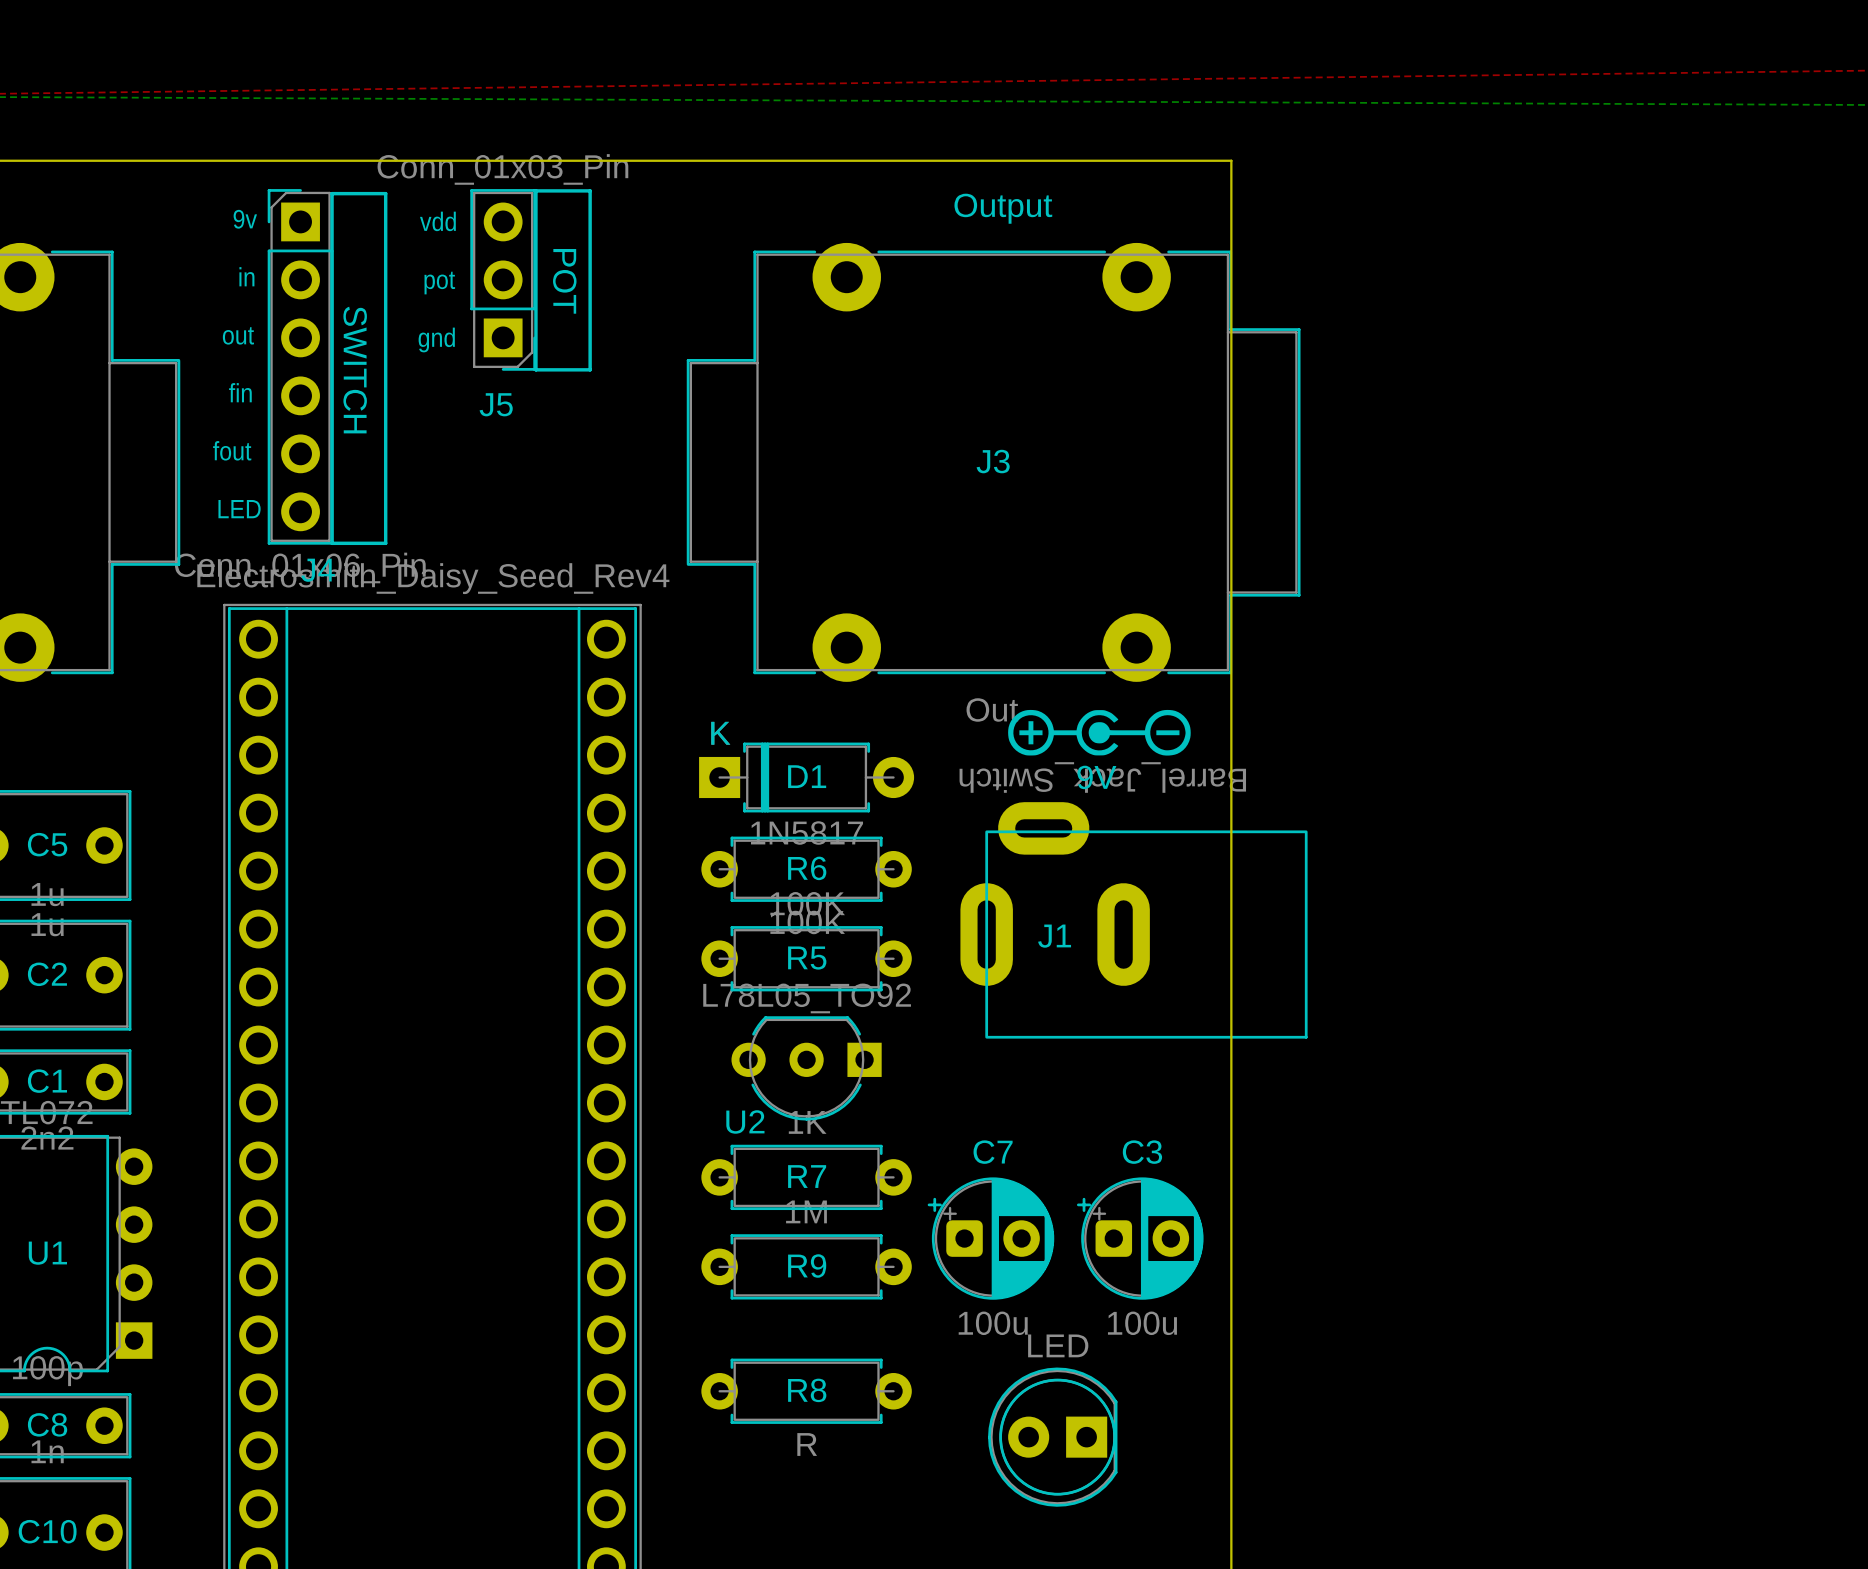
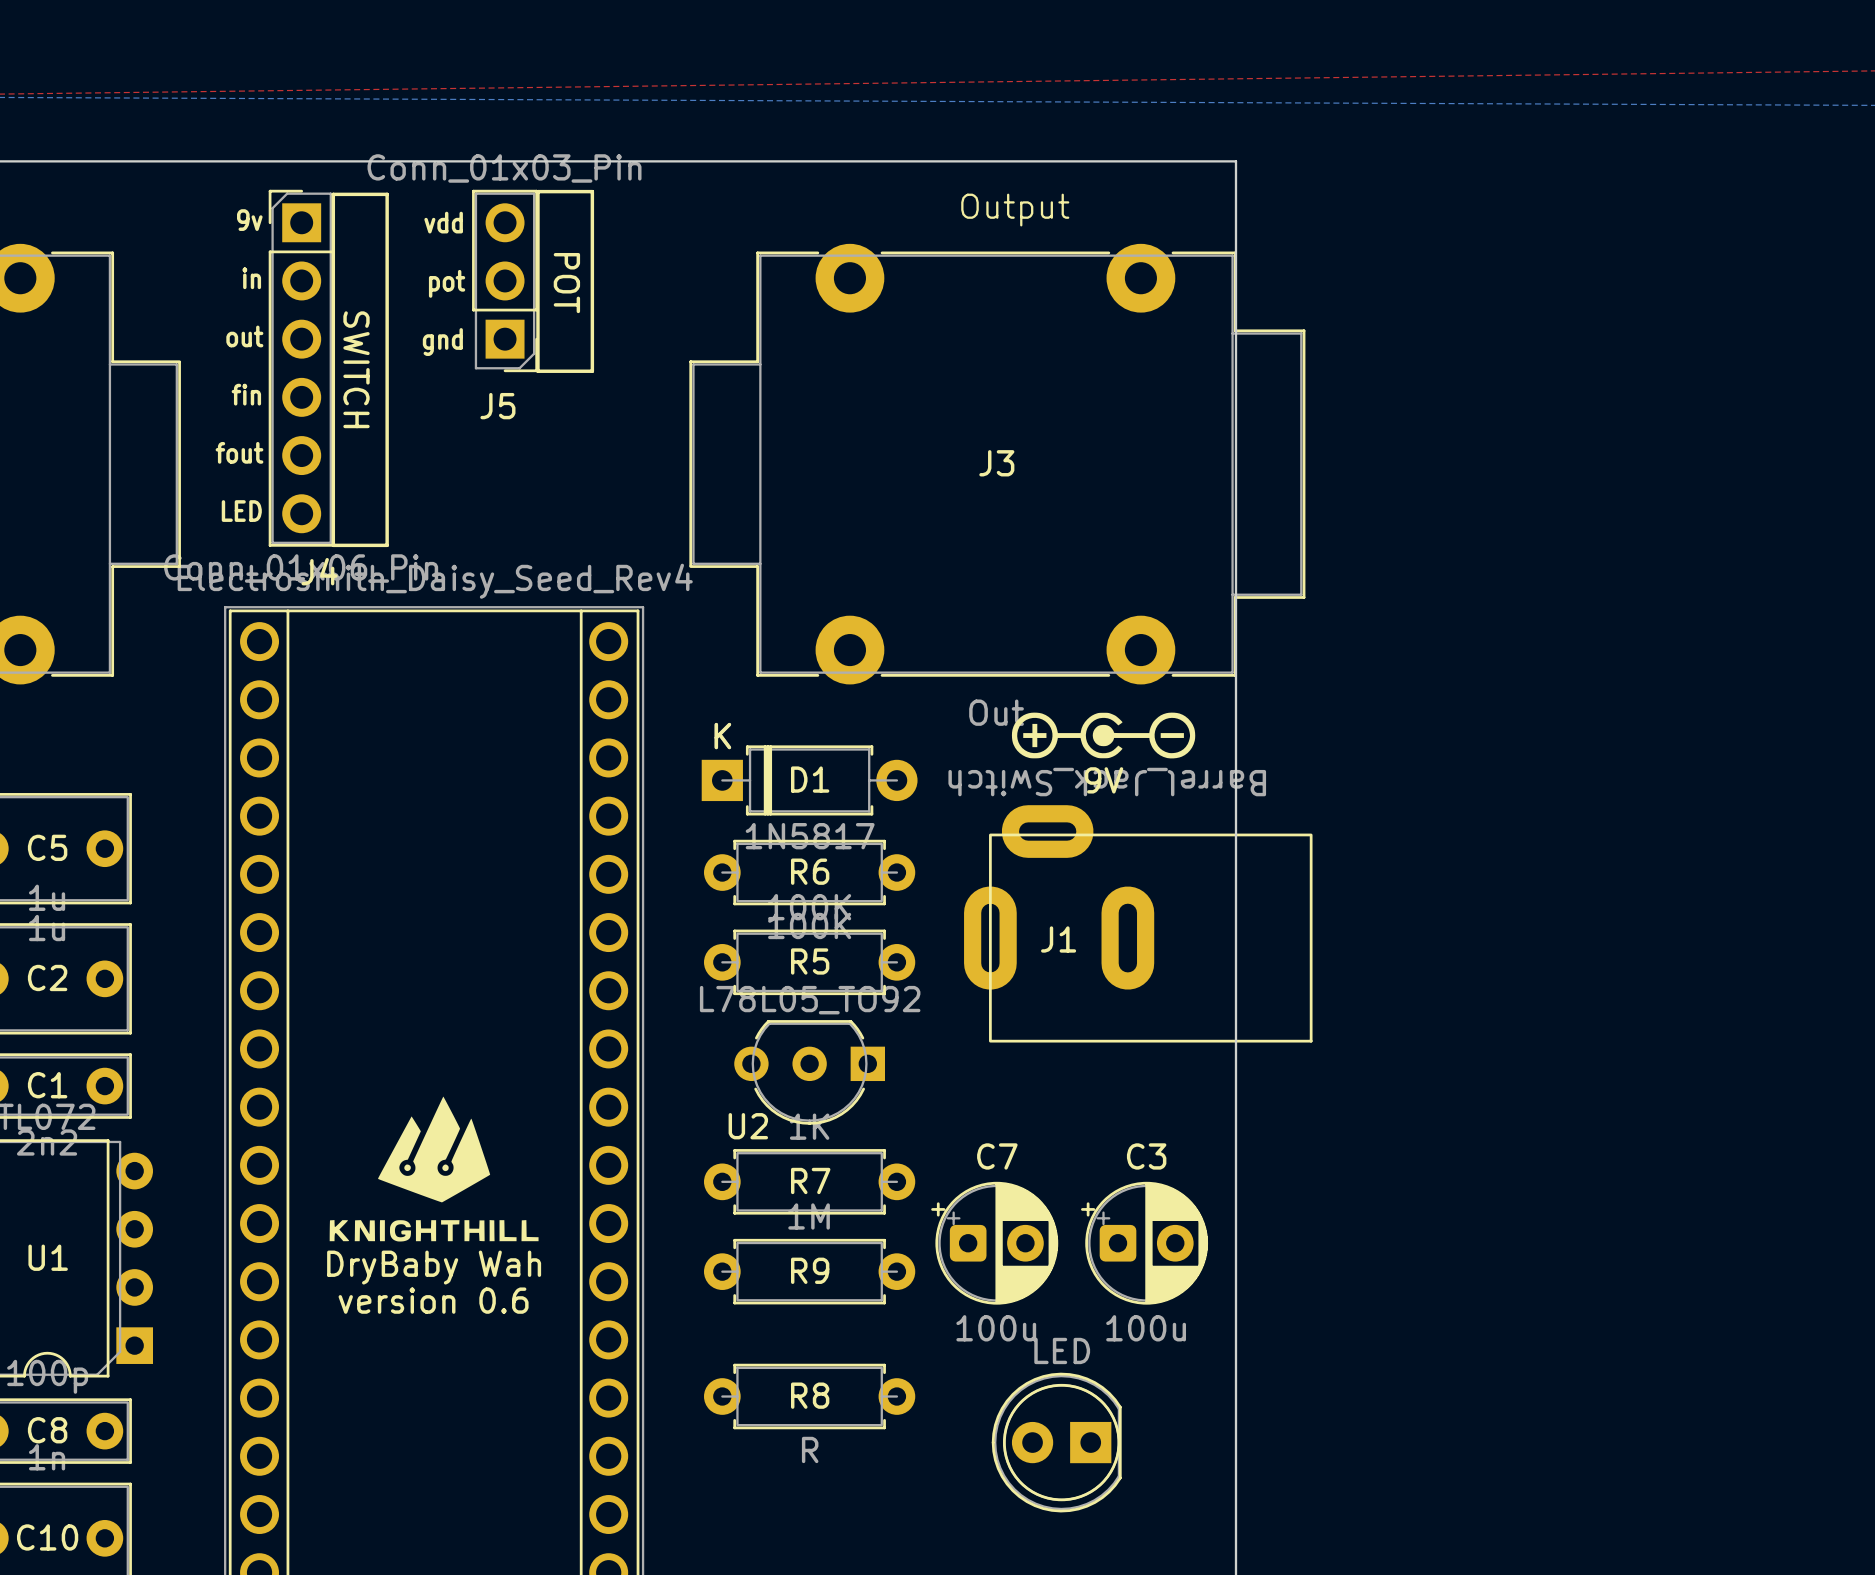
drawing: none -> [329, 1096, 539, 1242]
text: none -> DryBaby Wah (434, 1267)
text: none -> version 0.6 (433, 1300)

